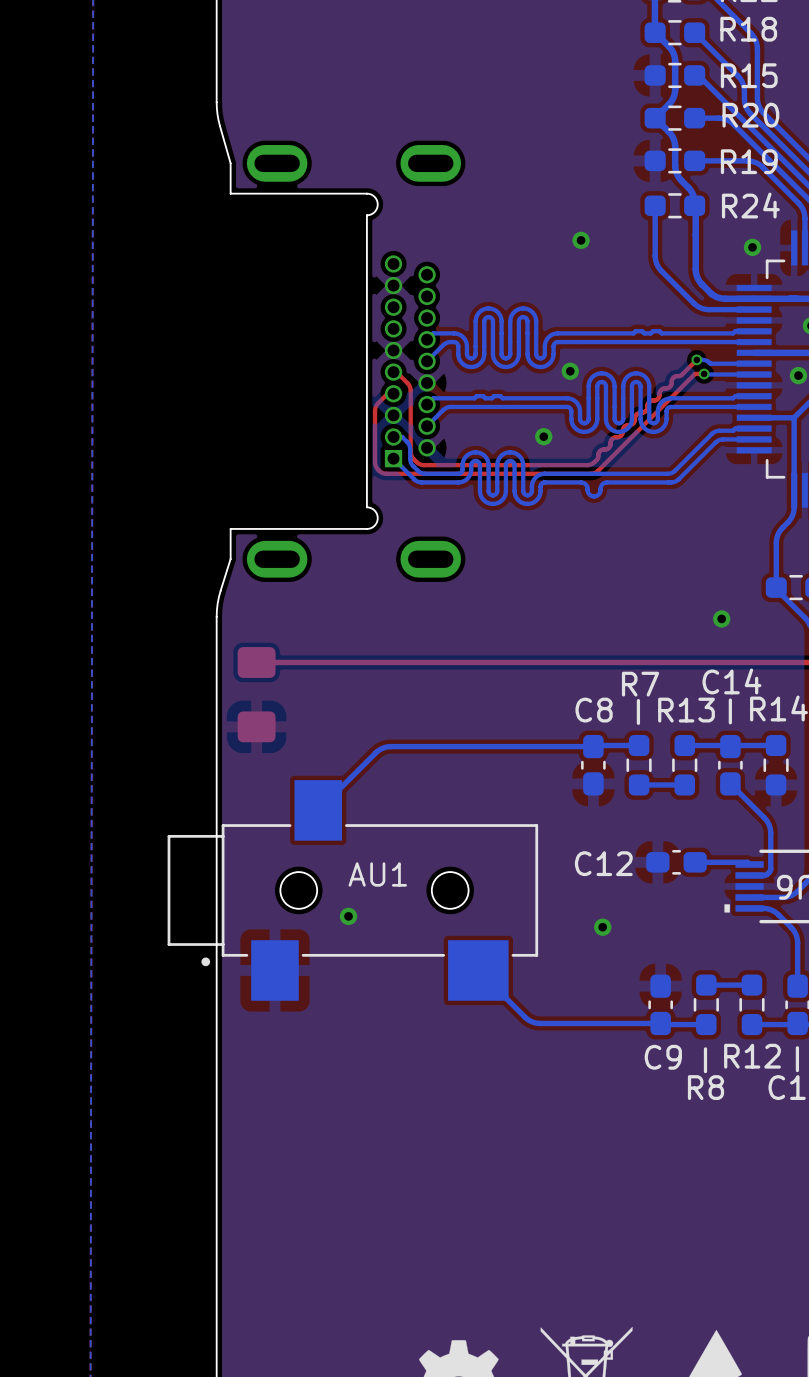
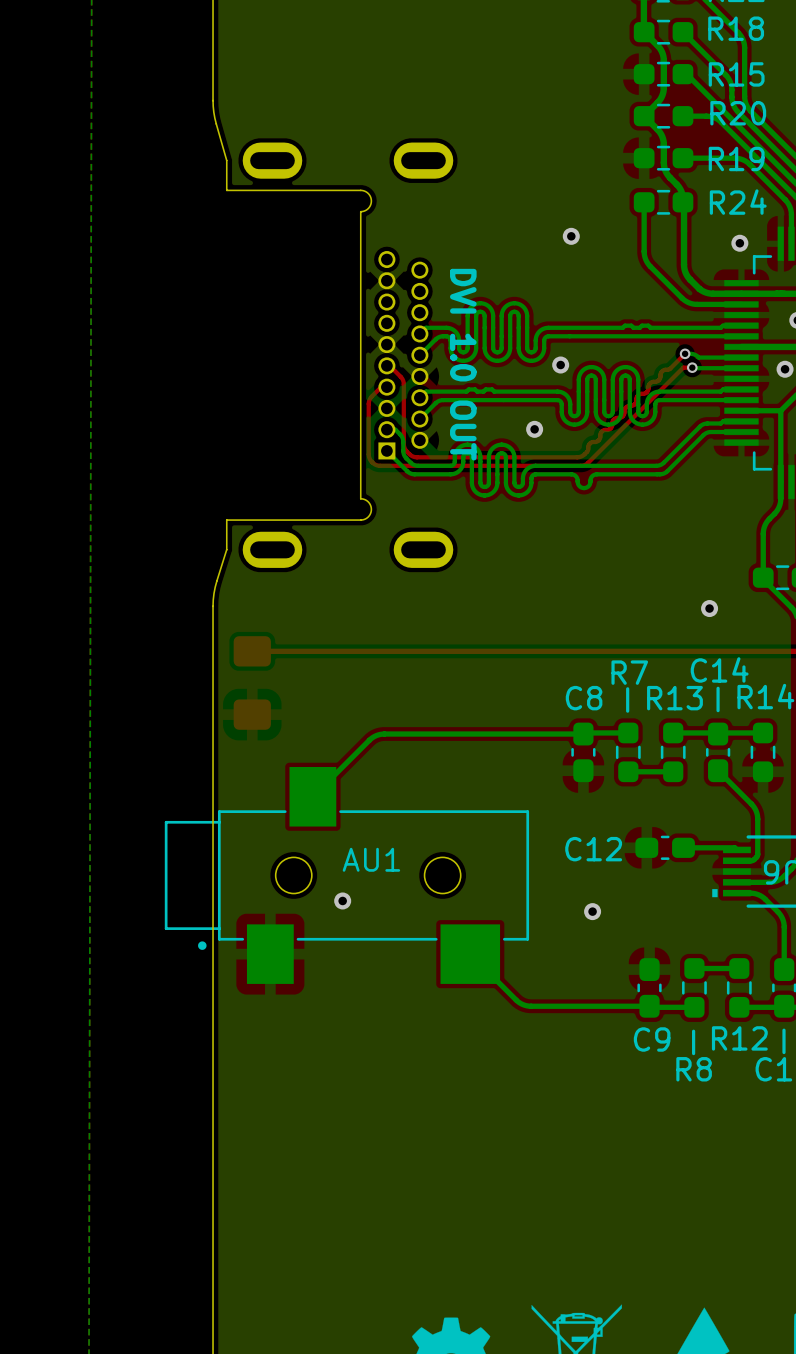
text: none -> DVI 1.0 OUT (463, 364)

